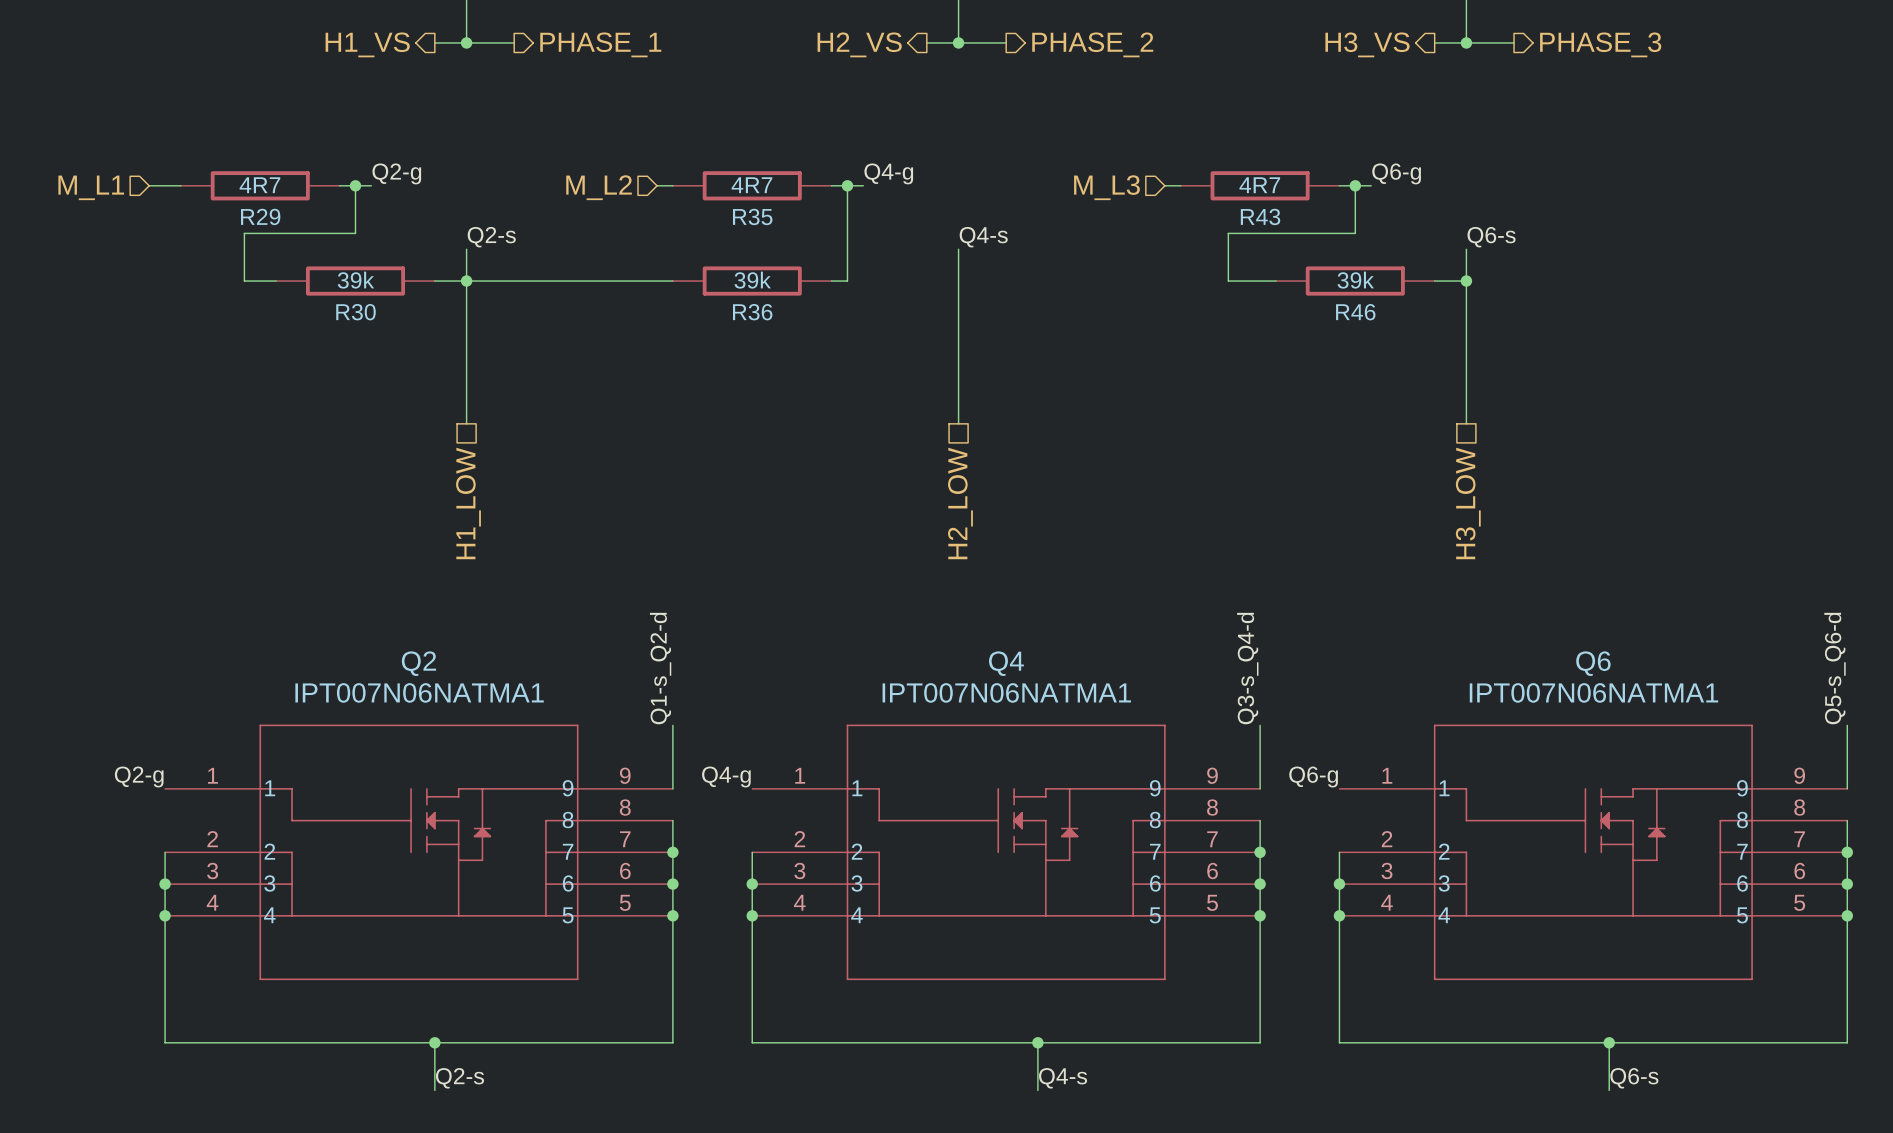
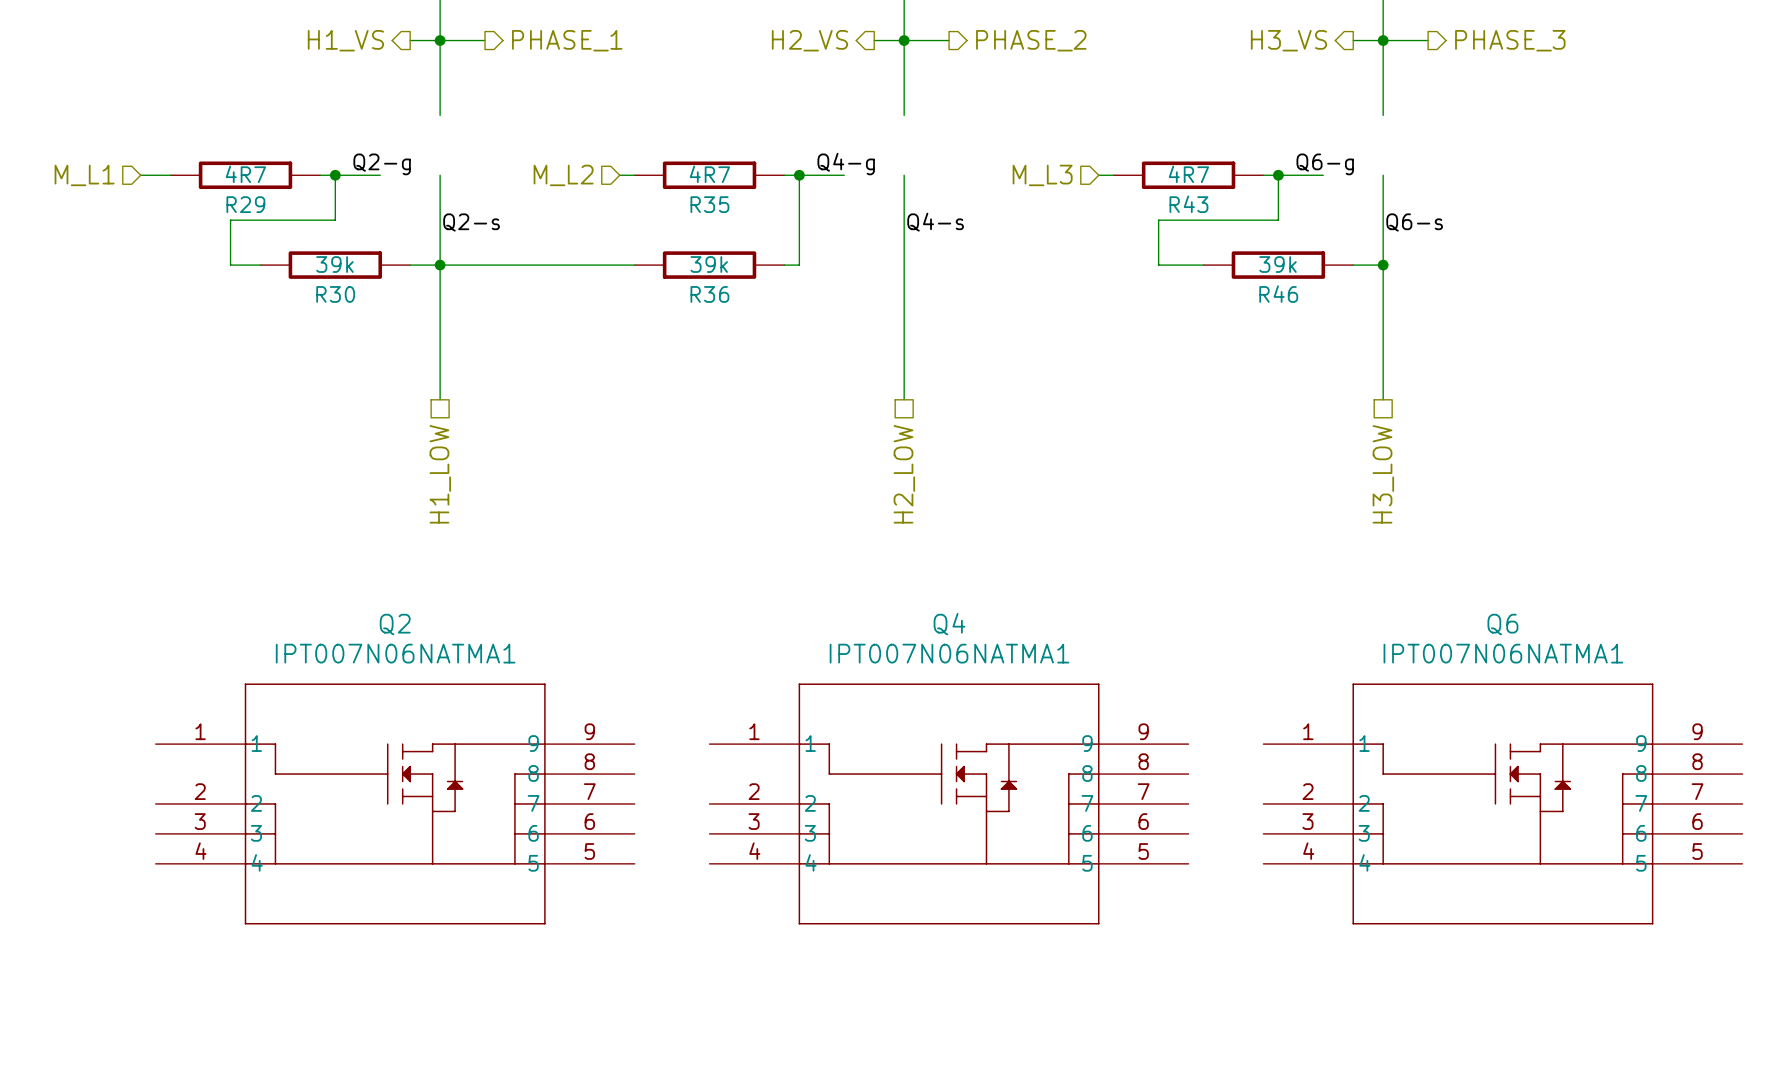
wire: none -> (440, 40) (440, 115)
wire: none -> (904, 40) (904, 115)
wire: none -> (1383, 40) (1383, 115)
wire: none -> (350, 175) (380, 175)
wire: none -> (440, 175) (440, 235)
wire: none -> (814, 175) (844, 175)
wire: none -> (904, 175) (904, 235)
wire: none -> (1293, 175) (1323, 175)
wire: none -> (1383, 175) (1383, 235)
label: Q1-s_Q2-d (660, 668) -> none
label: Q3-s_Q4-d (1247, 668) -> none
label: Q5-s_Q6-d (1834, 668) -> none
wire: (672, 725) (672, 788) -> none
wire: (1260, 725) (1260, 788) -> none
wire: (1847, 725) (1847, 788) -> none
label: Q2-g (139, 776) -> none
label: Q4-g (726, 776) -> none
label: Q6-g (1313, 776) -> none
wire: (672, 820) (672, 1042) (165, 1042) (165, 852) -> none
wire: (1260, 820) (1260, 1042) (752, 1042) (752, 852) -> none
wire: (1847, 820) (1847, 1042) (1339, 1042) (1339, 852) -> none
junction: (672, 852) -> none
junction: (1260, 852) -> none
junction: (1847, 852) -> none
junction: (165, 884) -> none
junction: (672, 884) -> none
junction: (752, 884) -> none
junction: (1260, 884) -> none
junction: (1339, 884) -> none
junction: (1847, 884) -> none
junction: (165, 915) -> none
junction: (672, 915) -> none
junction: (752, 915) -> none
junction: (1260, 915) -> none
junction: (1339, 915) -> none
junction: (1847, 915) -> none
wire: (434, 1042) (434, 1090) -> none
junction: (434, 1042) -> none
wire: (1037, 1042) (1037, 1090) -> none
junction: (1037, 1042) -> none
wire: (1609, 1042) (1609, 1090) -> none
junction: (1609, 1042) -> none
label: Q2-s (459, 1078) -> none
label: Q4-s (1063, 1078) -> none
label: Q6-s (1634, 1078) -> none

